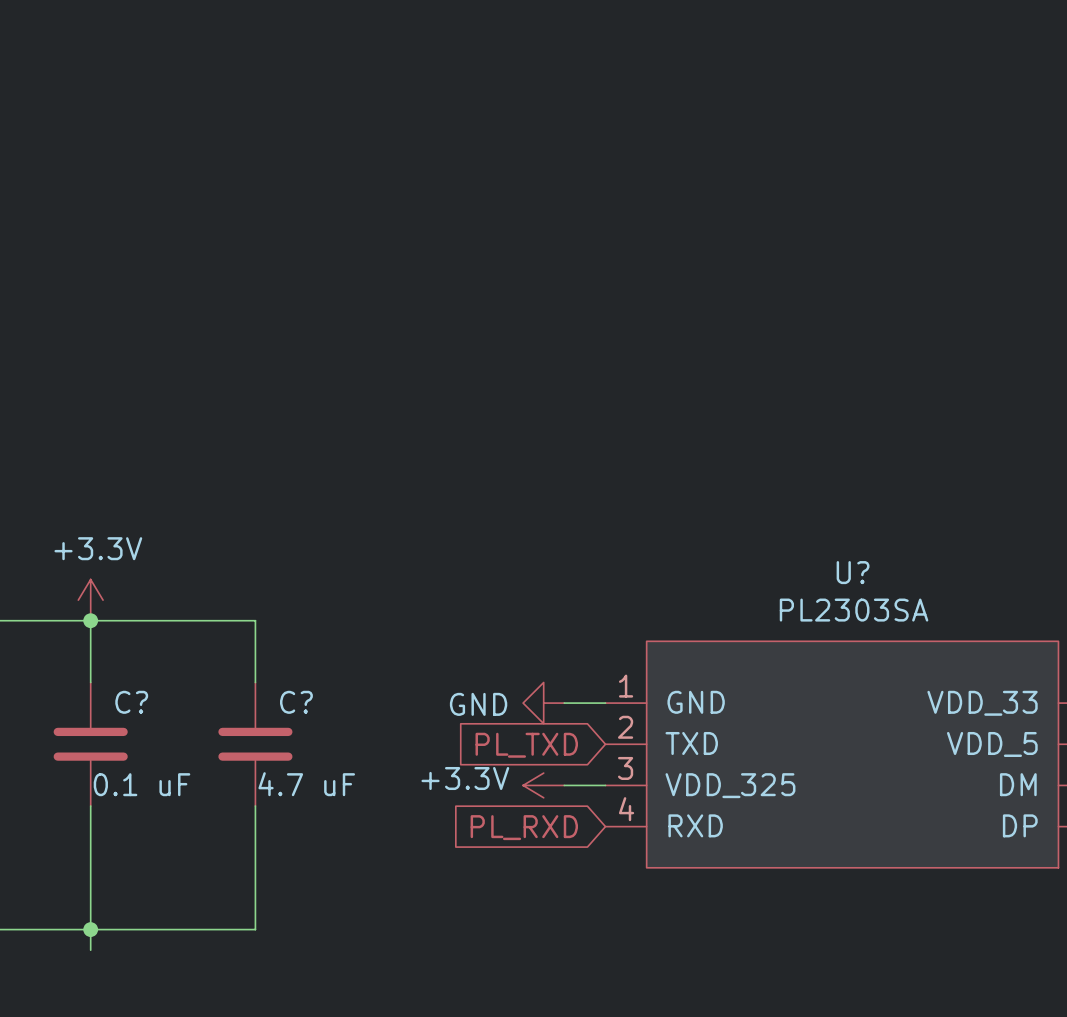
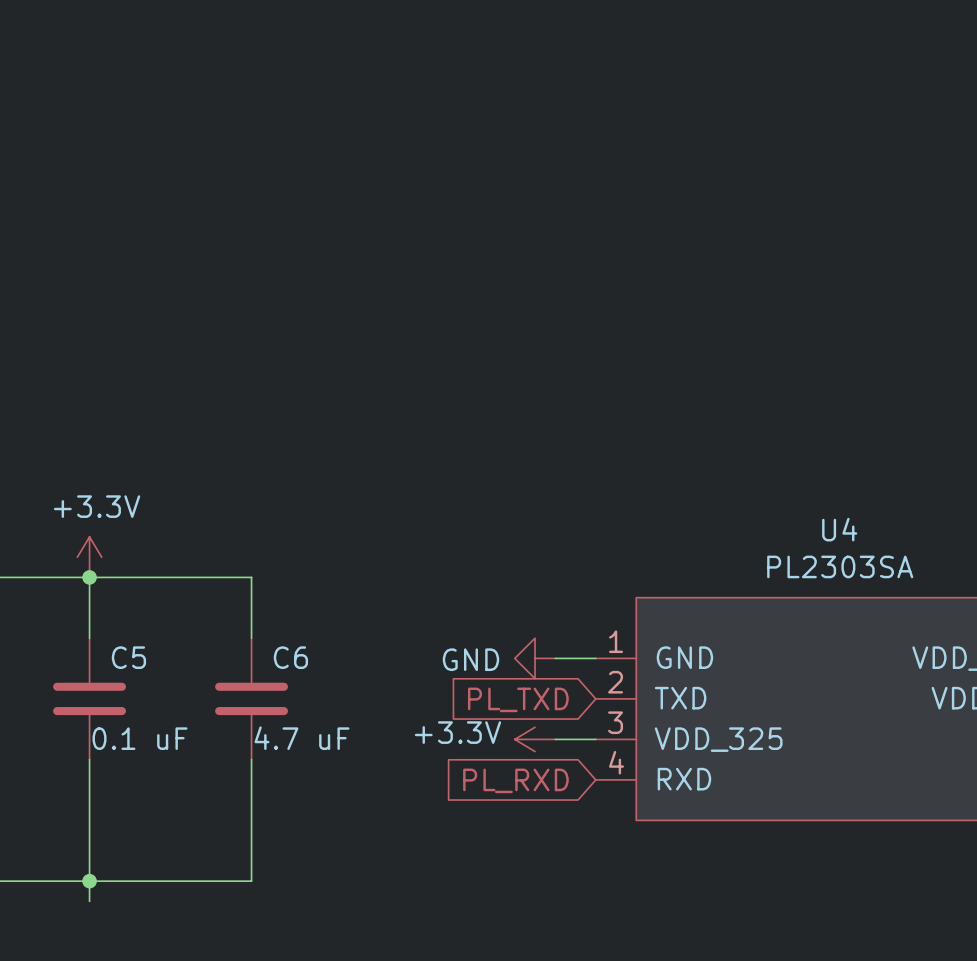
U? name: U? (853, 572) -> U4 (839, 529)
C? name: C? (131, 702) -> C5 (128, 657)
C? name: C? (296, 702) -> C6 (290, 657)

